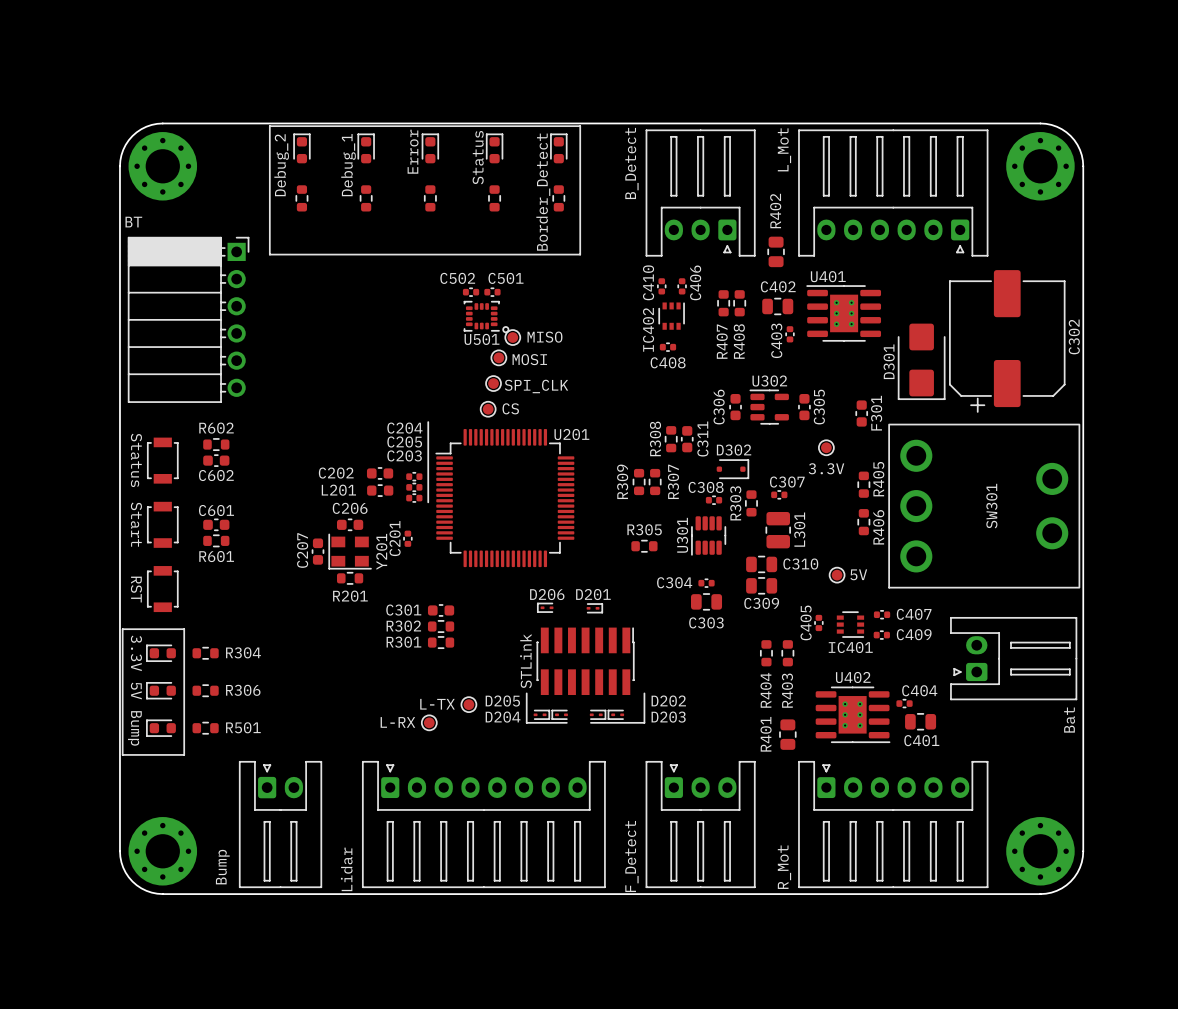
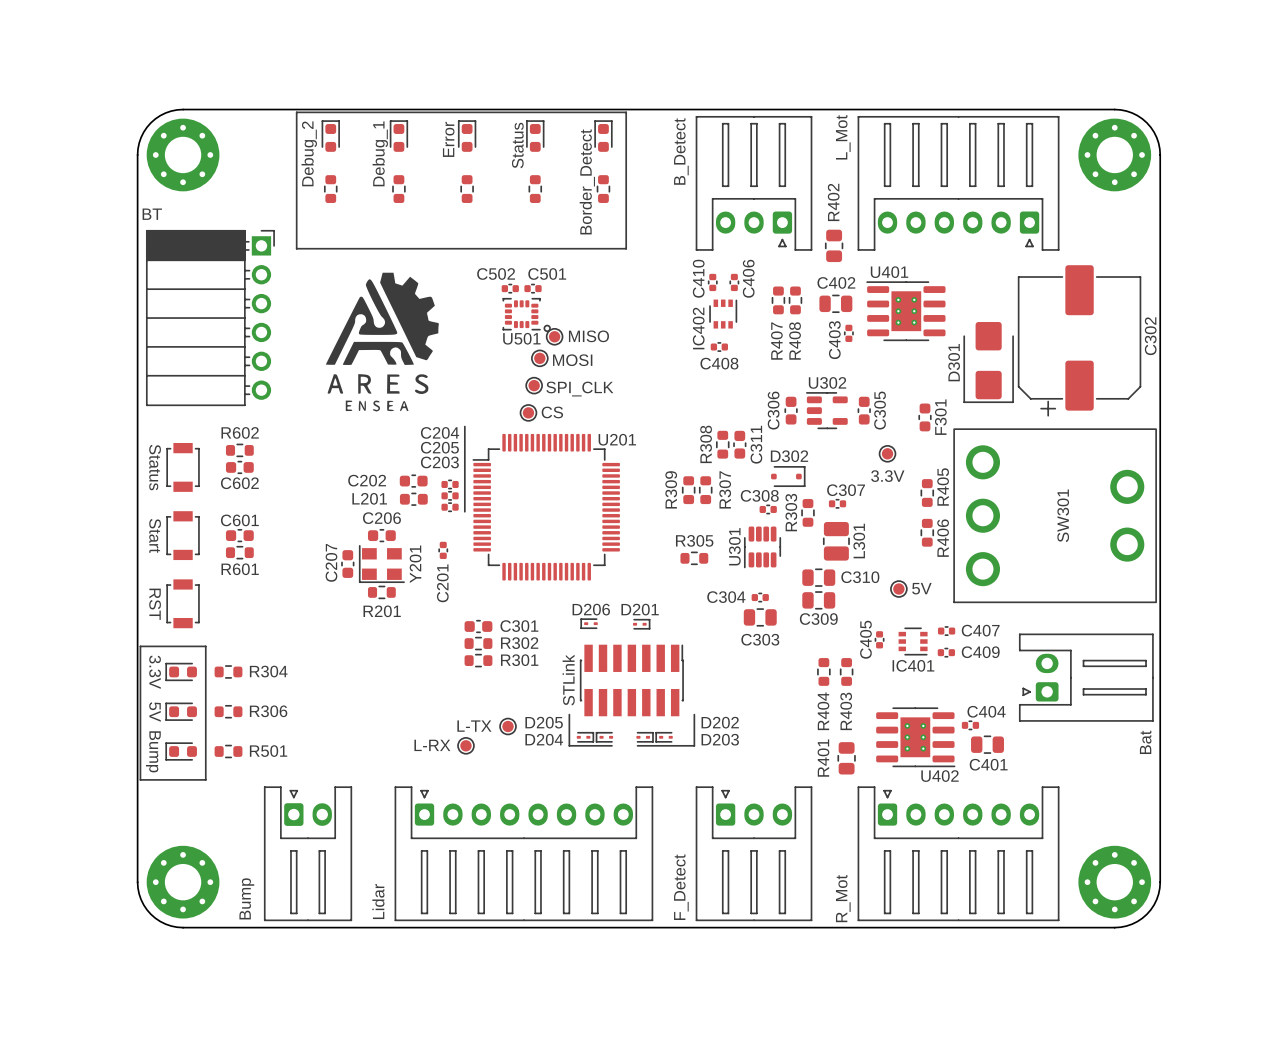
drawing: none -> [325, 272, 439, 412]
C201 name position: C201 (395, 538) -> C201 (442, 583)
C301 name position: C301 (403, 610) -> C301 (519, 626)
R302 name position: R302 (403, 626) -> R302 (519, 643)
R301 name position: R301 (403, 642) -> R301 (519, 660)
U402 name position: U402 (853, 677) -> U402 (940, 776)

